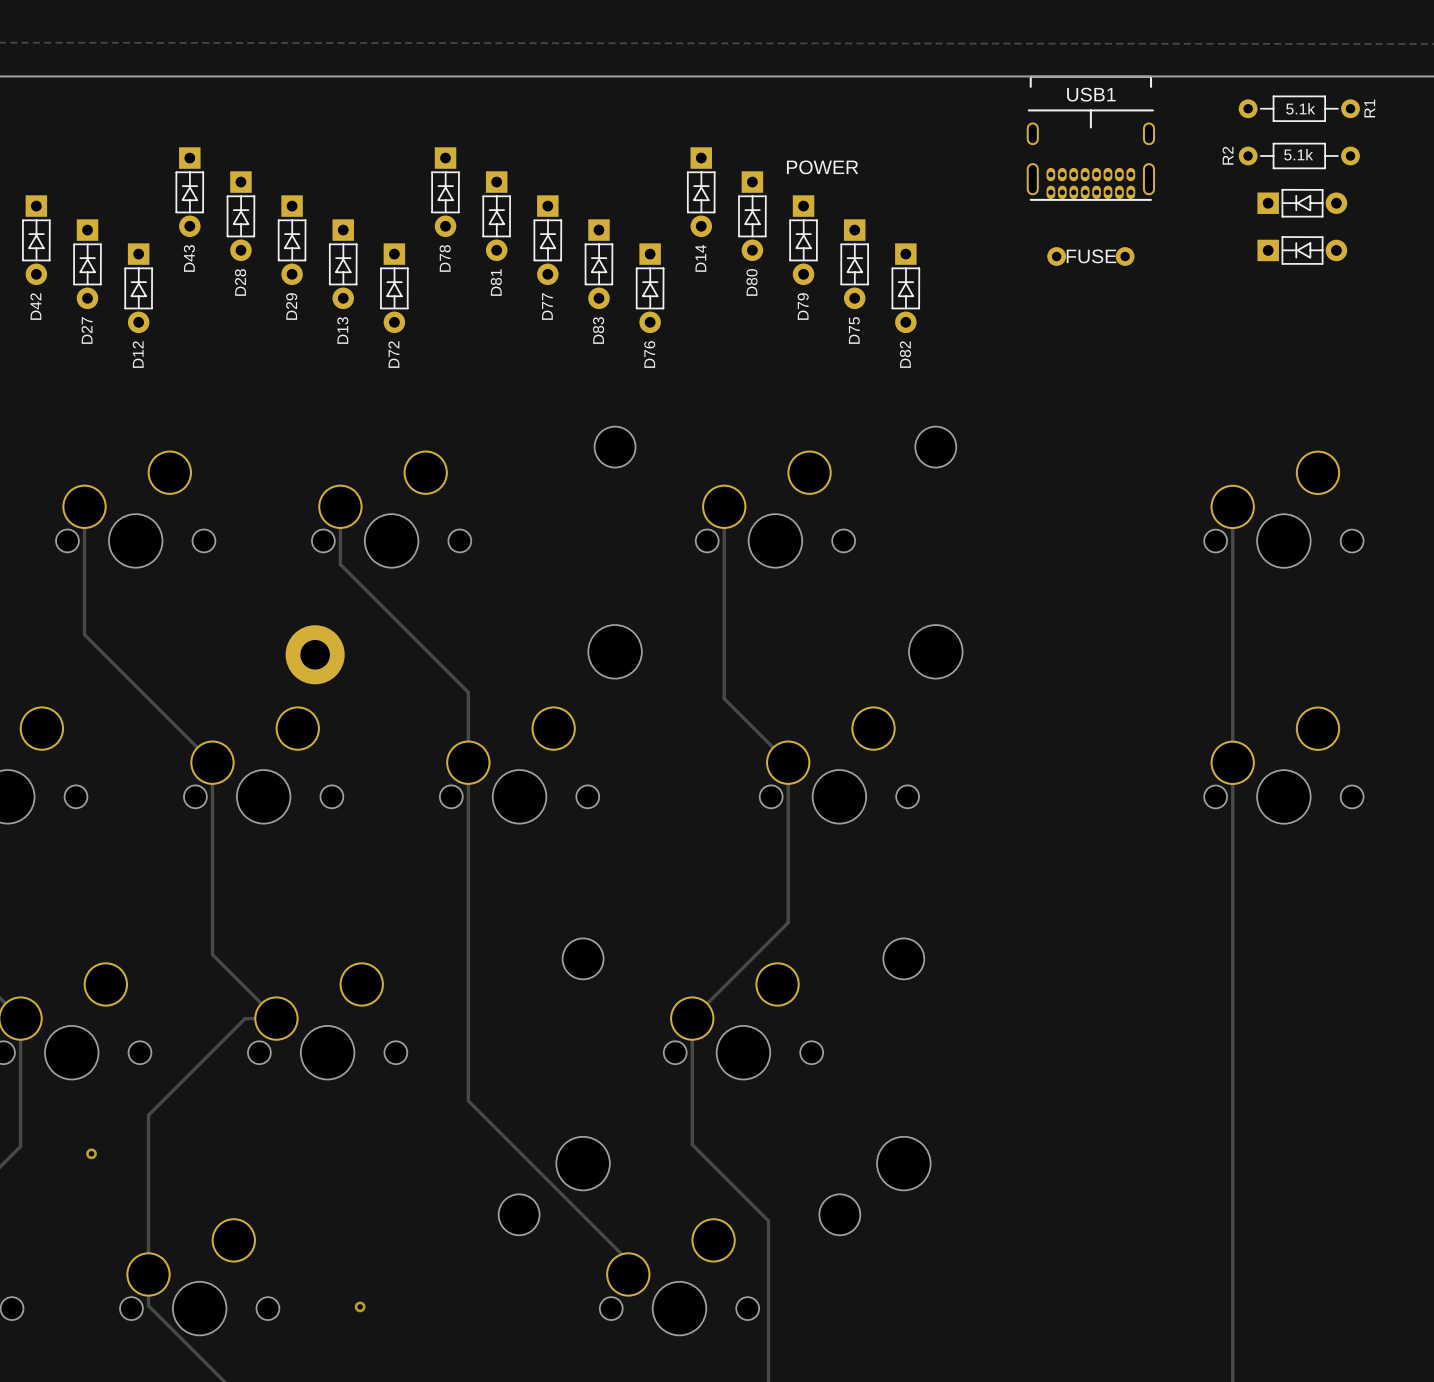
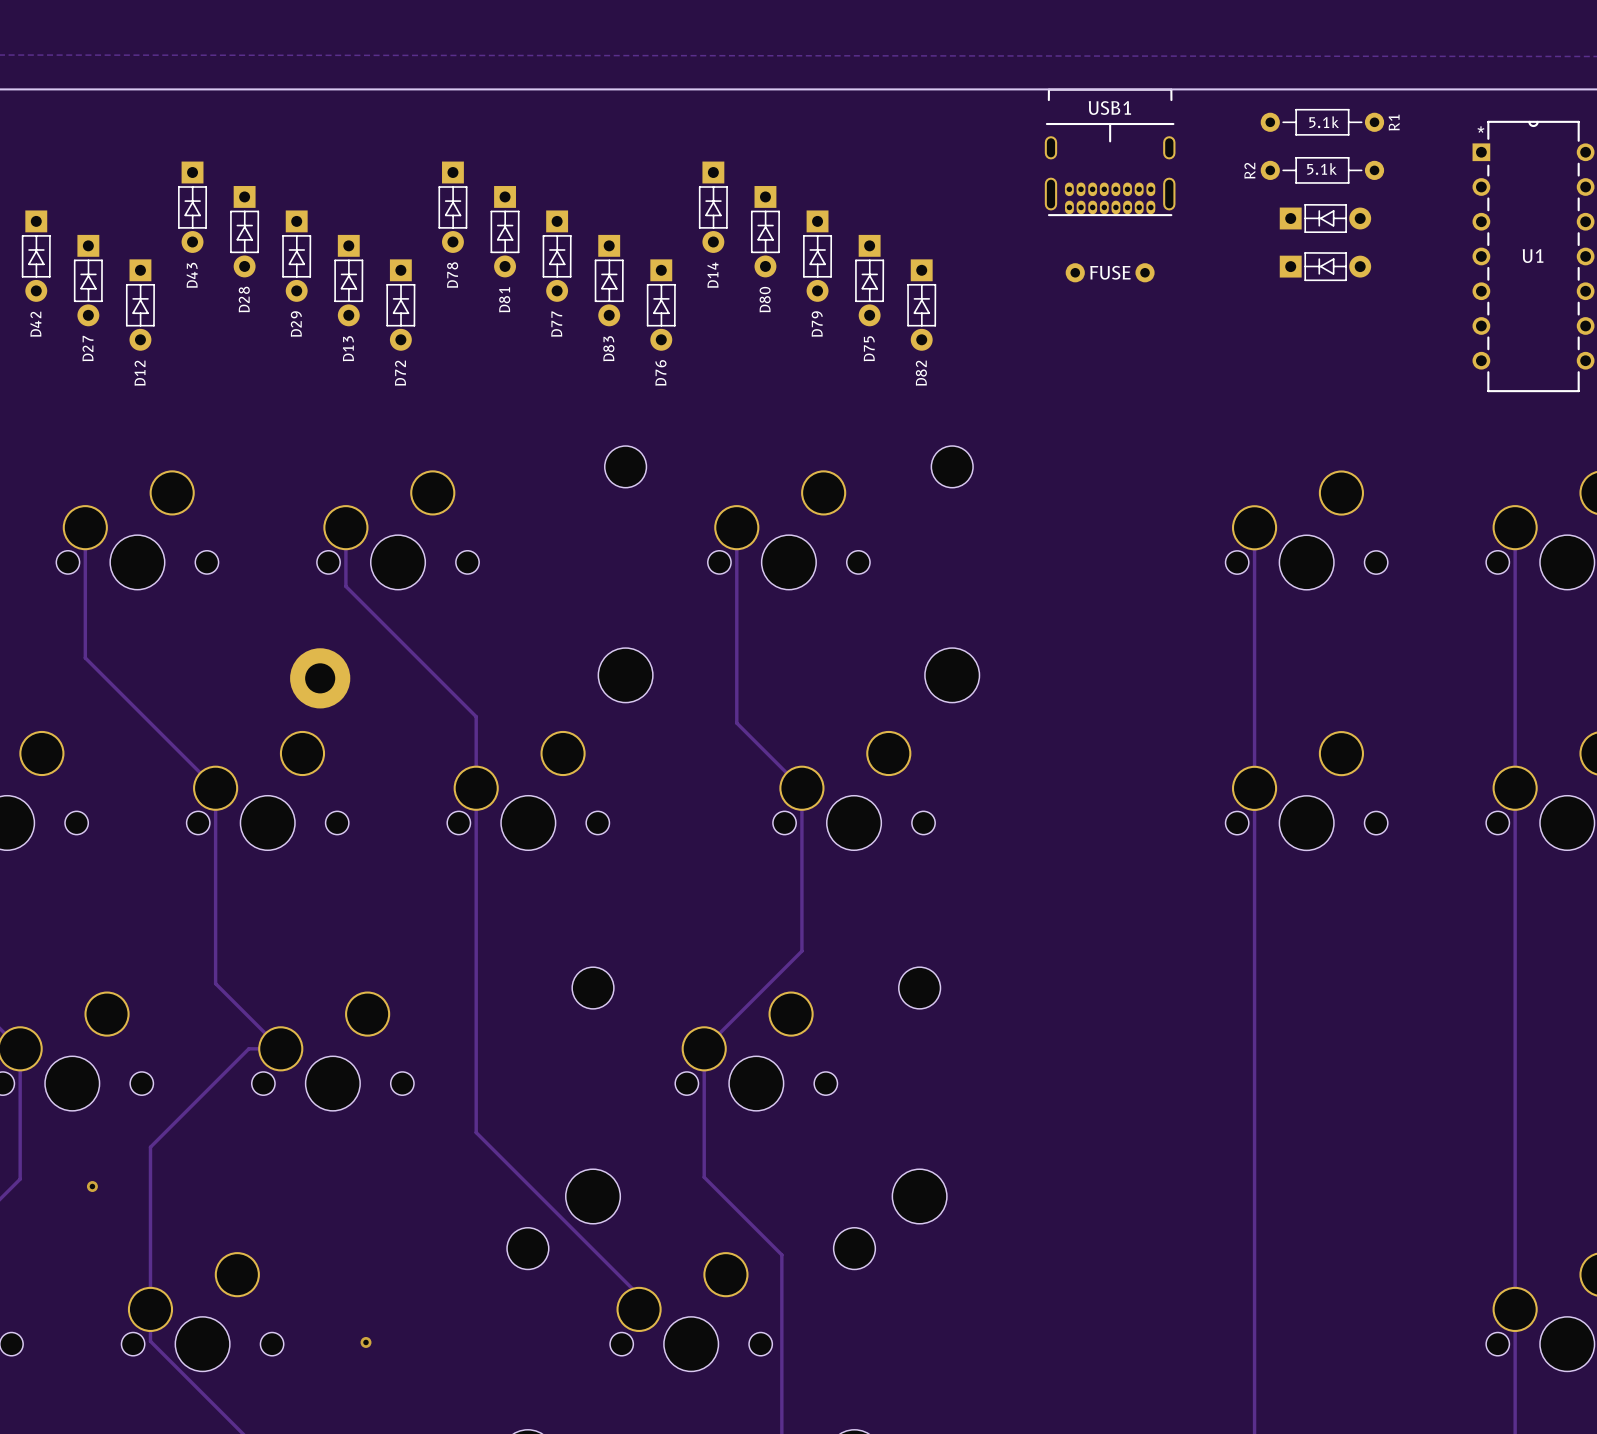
text: POWER (822, 167) -> none

